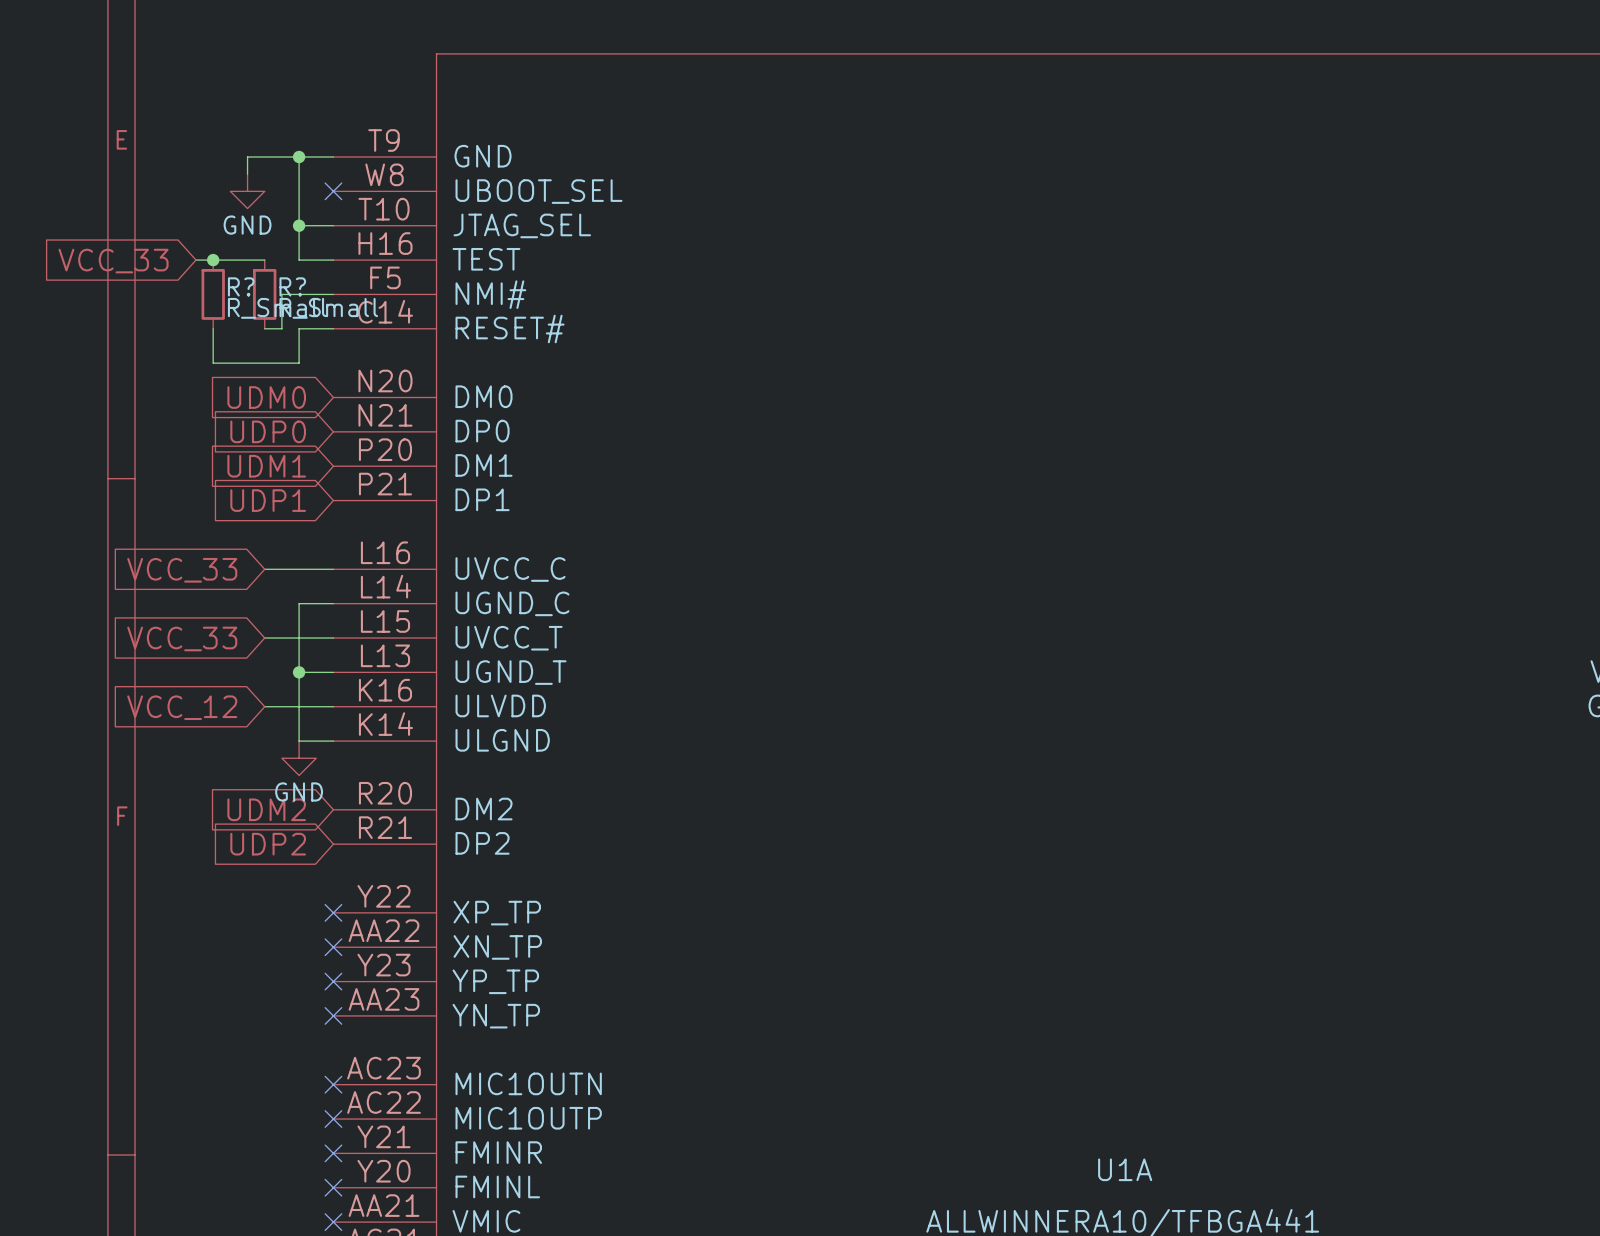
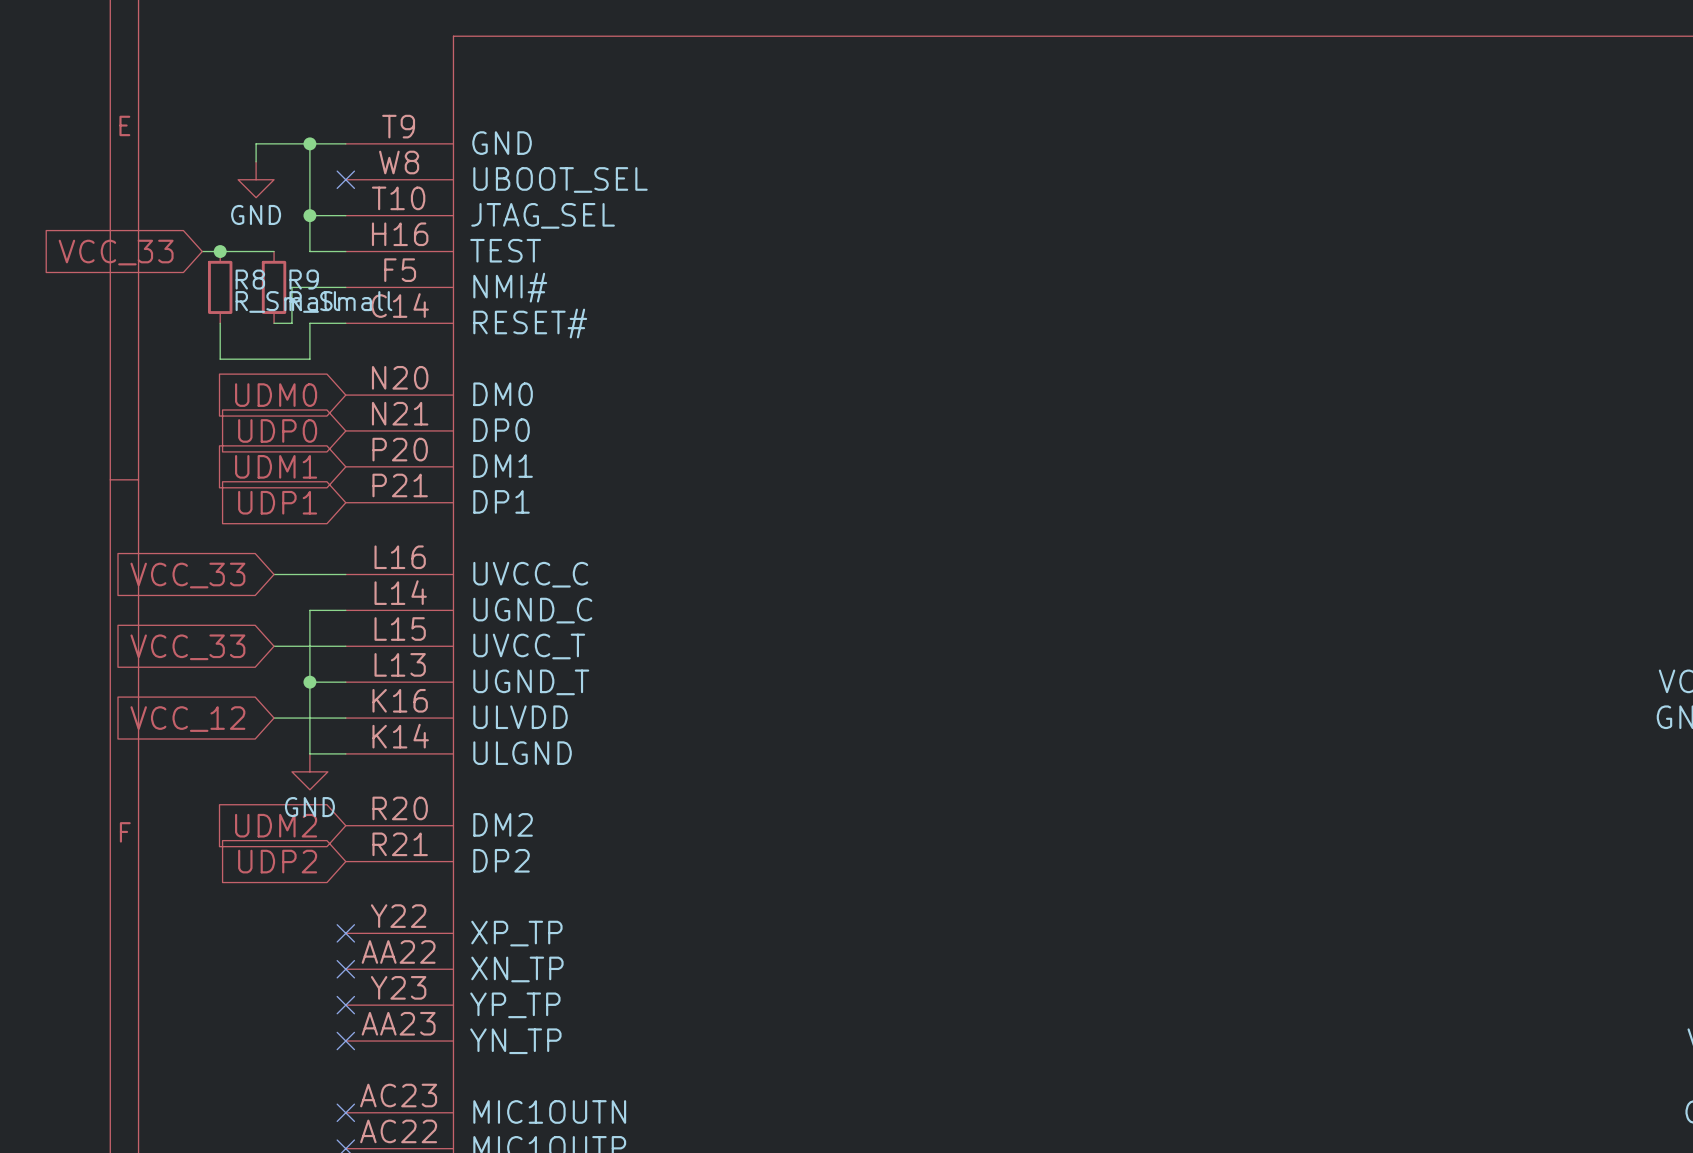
R? name: R? (241, 286) -> R8 (250, 279)
R? name: R? (292, 286) -> R9 (304, 279)

